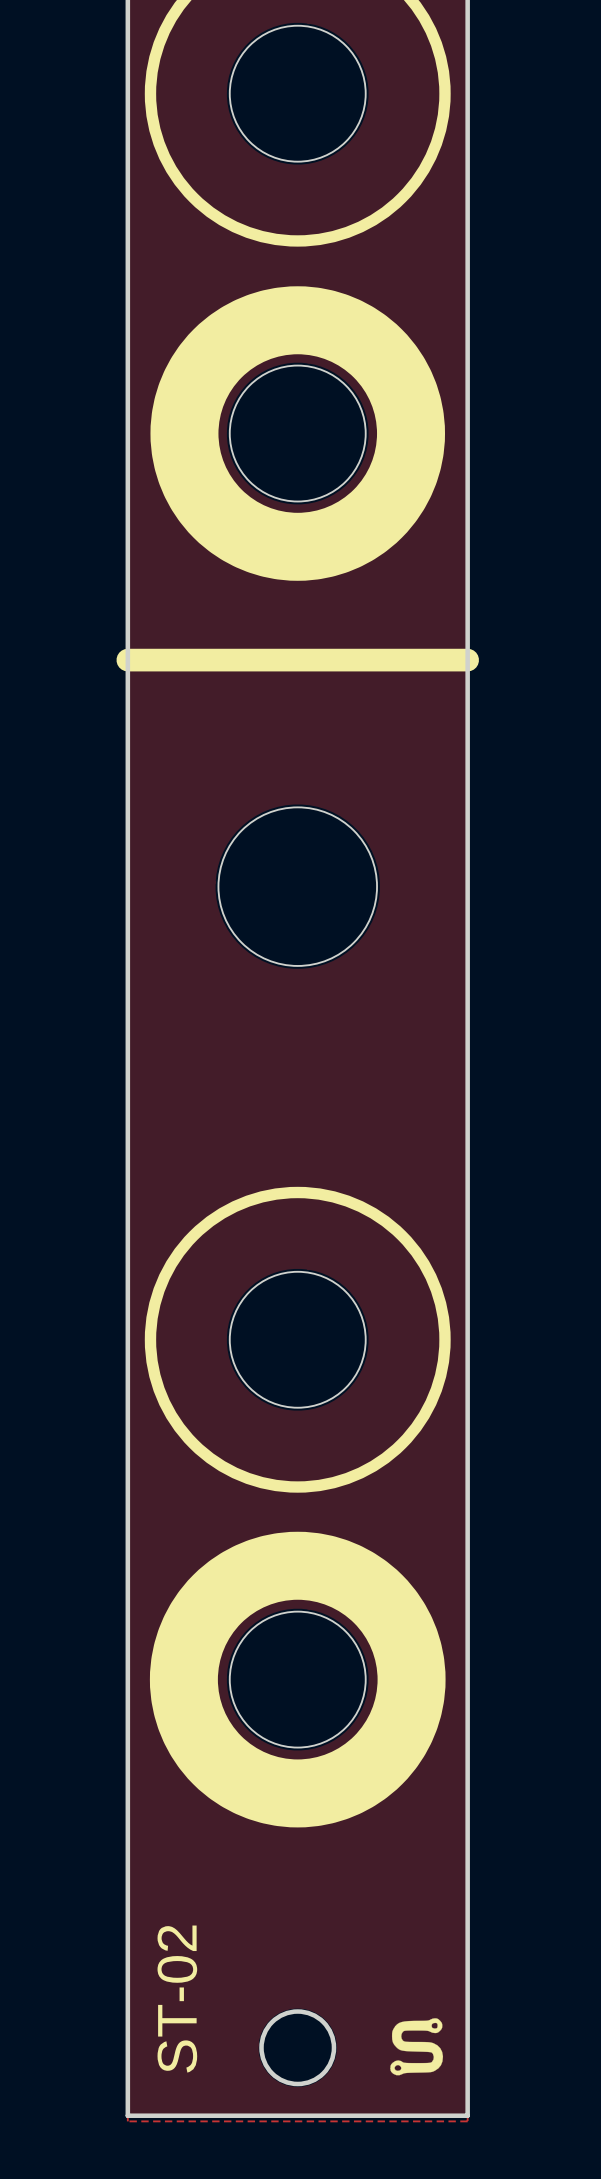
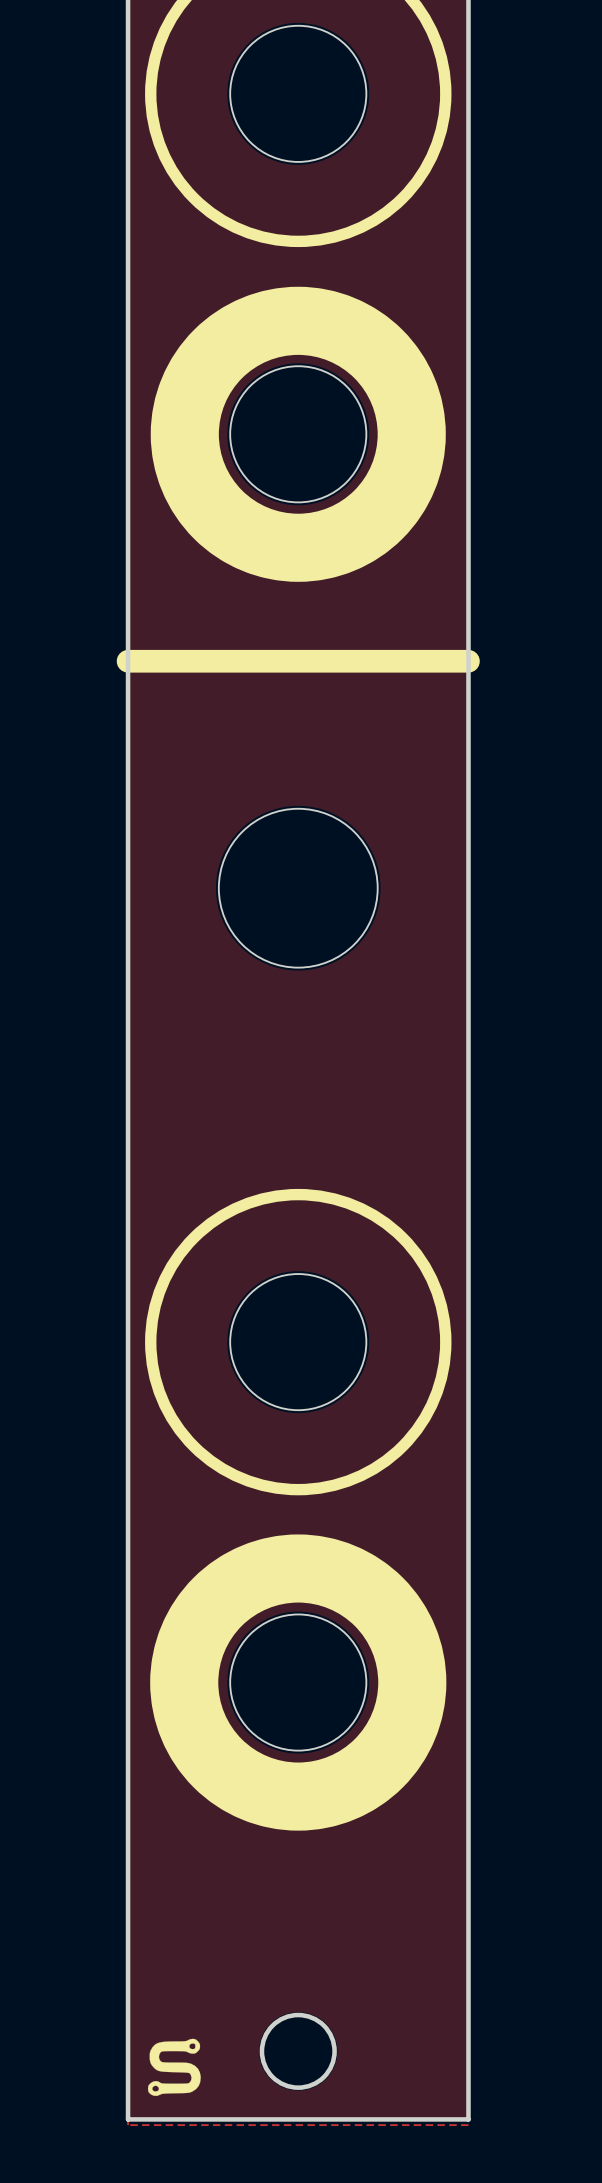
text: ST-02 (177, 1999) -> none
drawing position: (416, 2046) -> (174, 2067)

